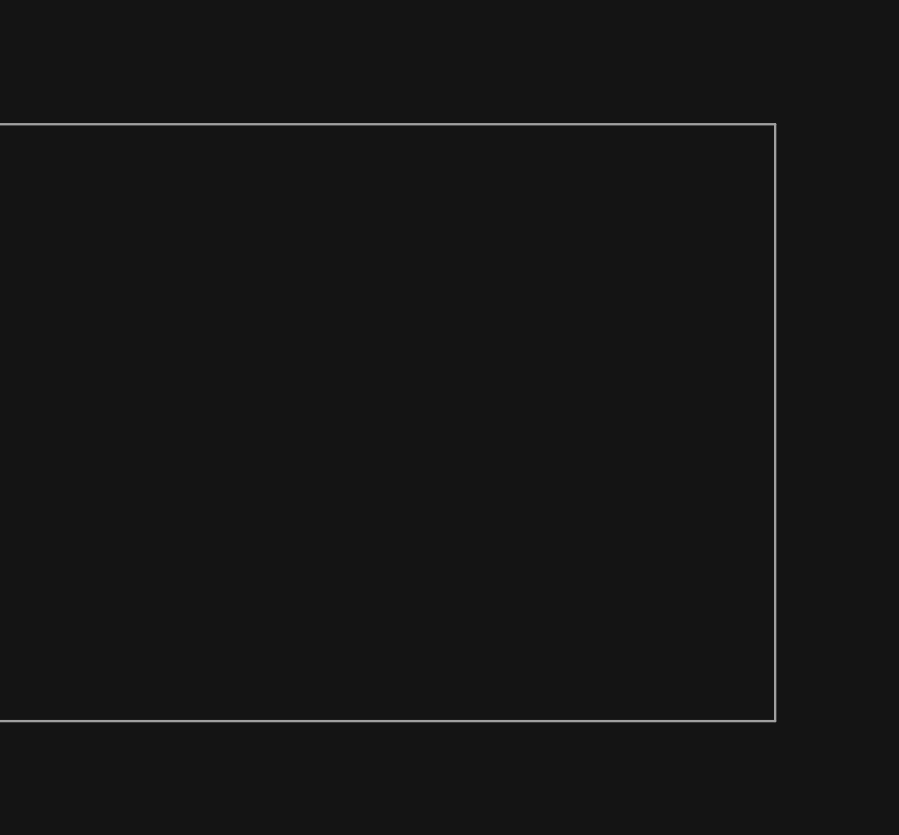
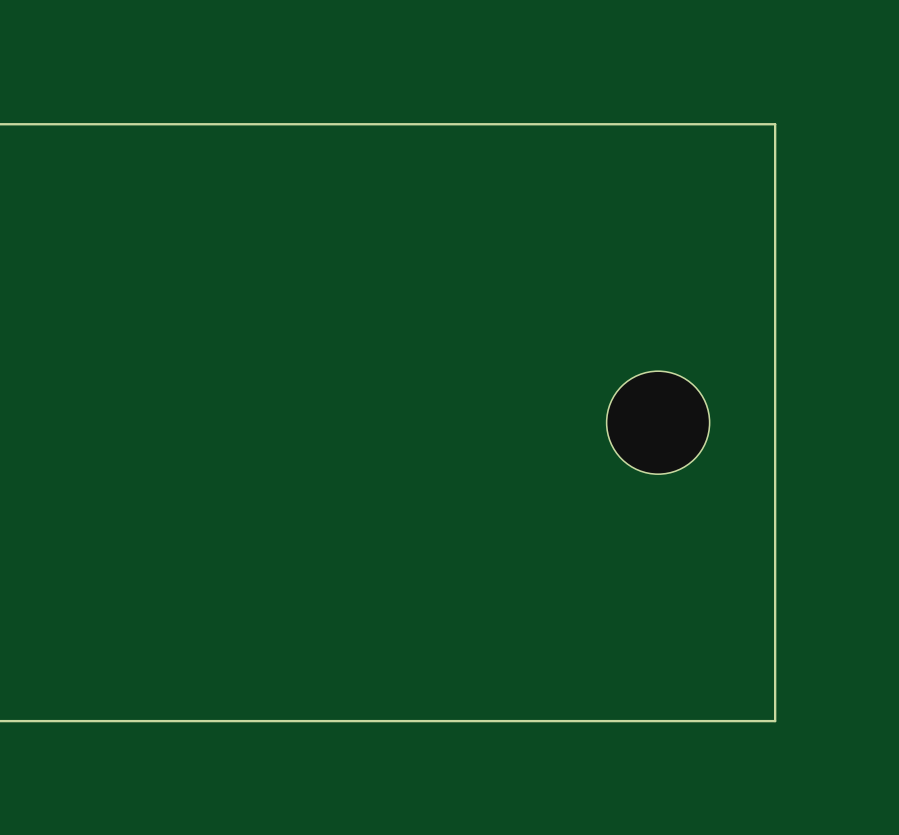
part: none -> (658, 422)

